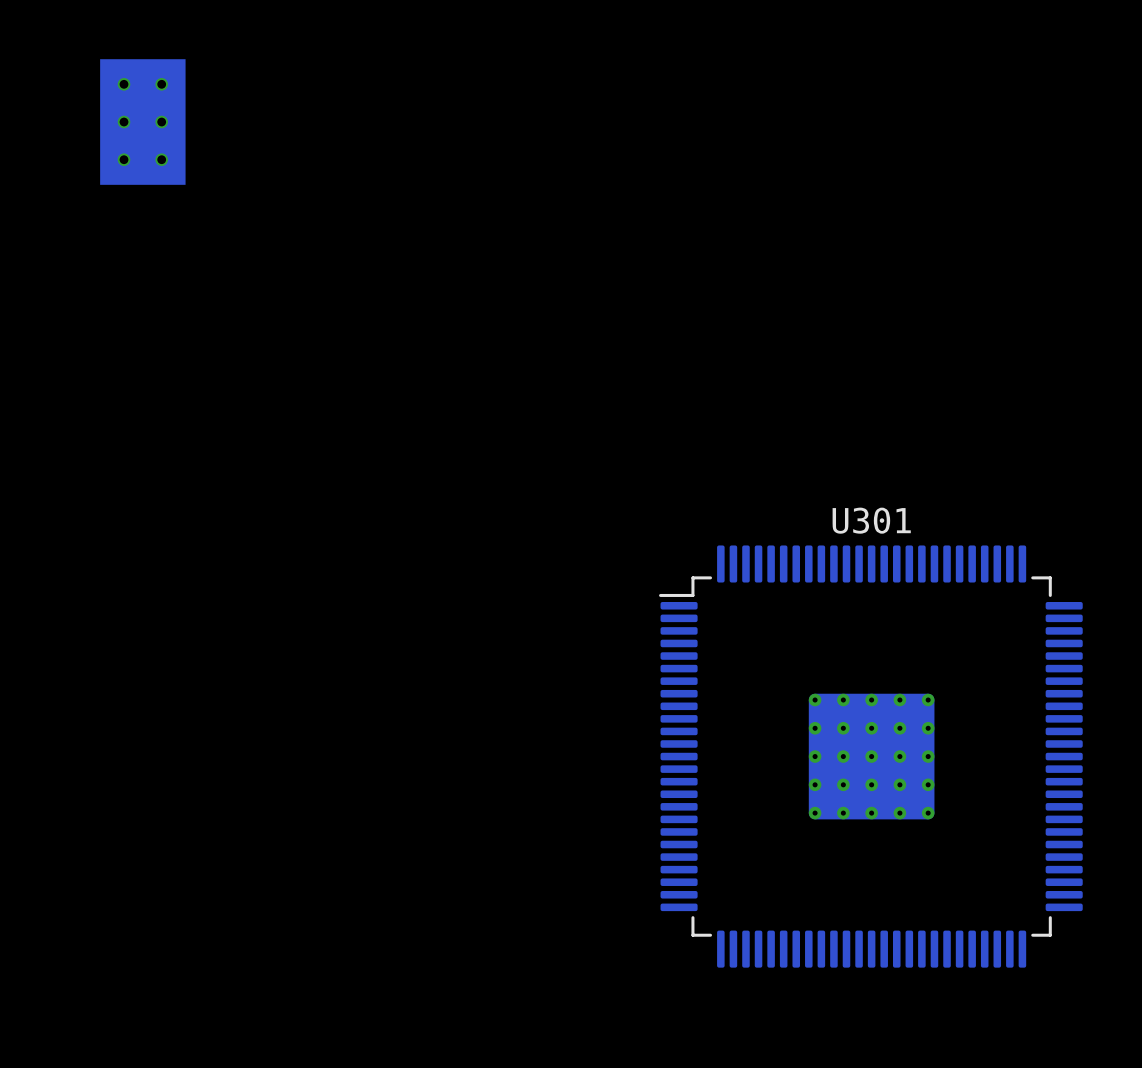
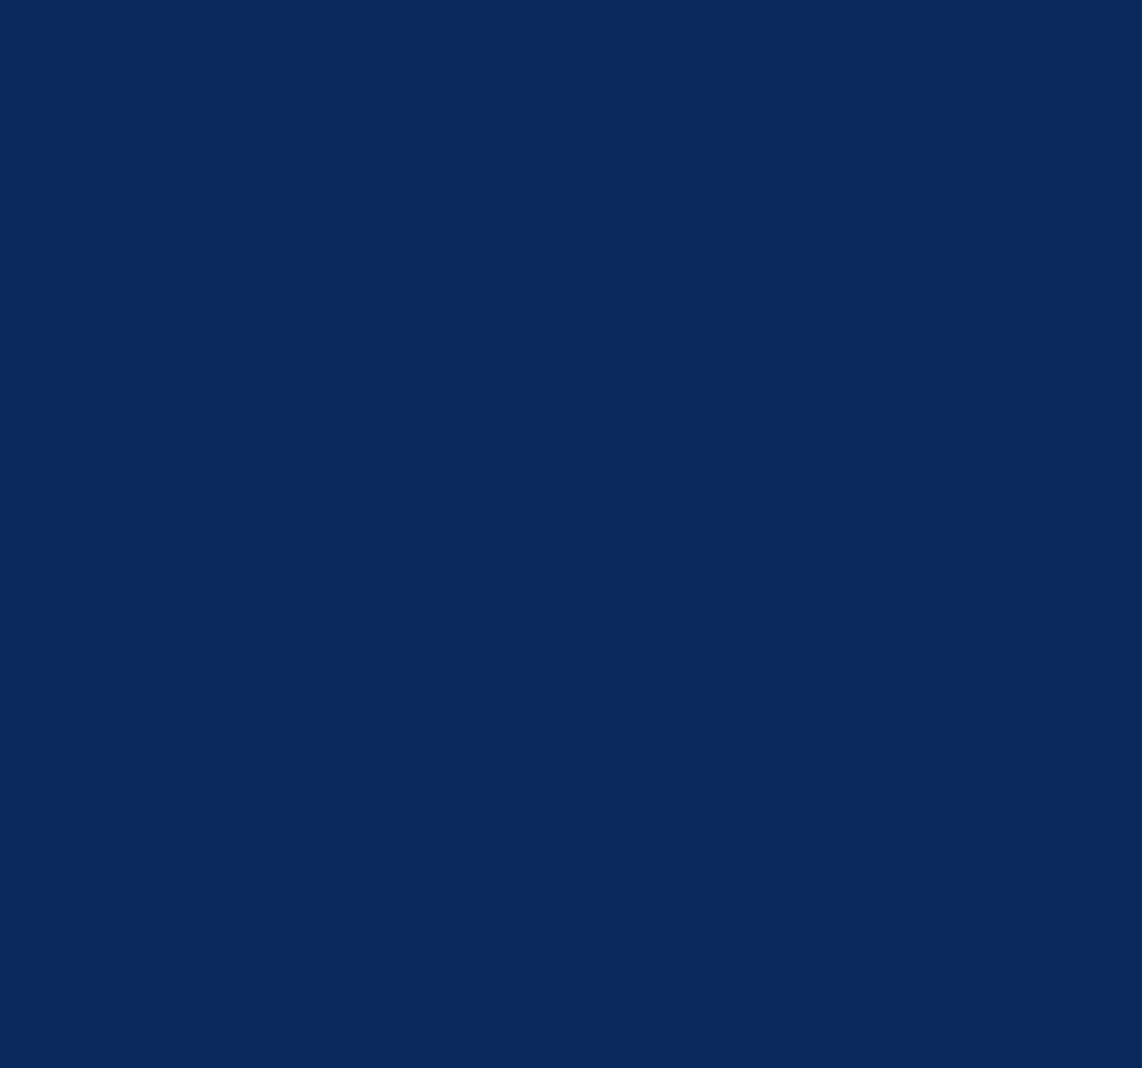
part: (142, 122) -> none
U301: (870, 756) -> none

